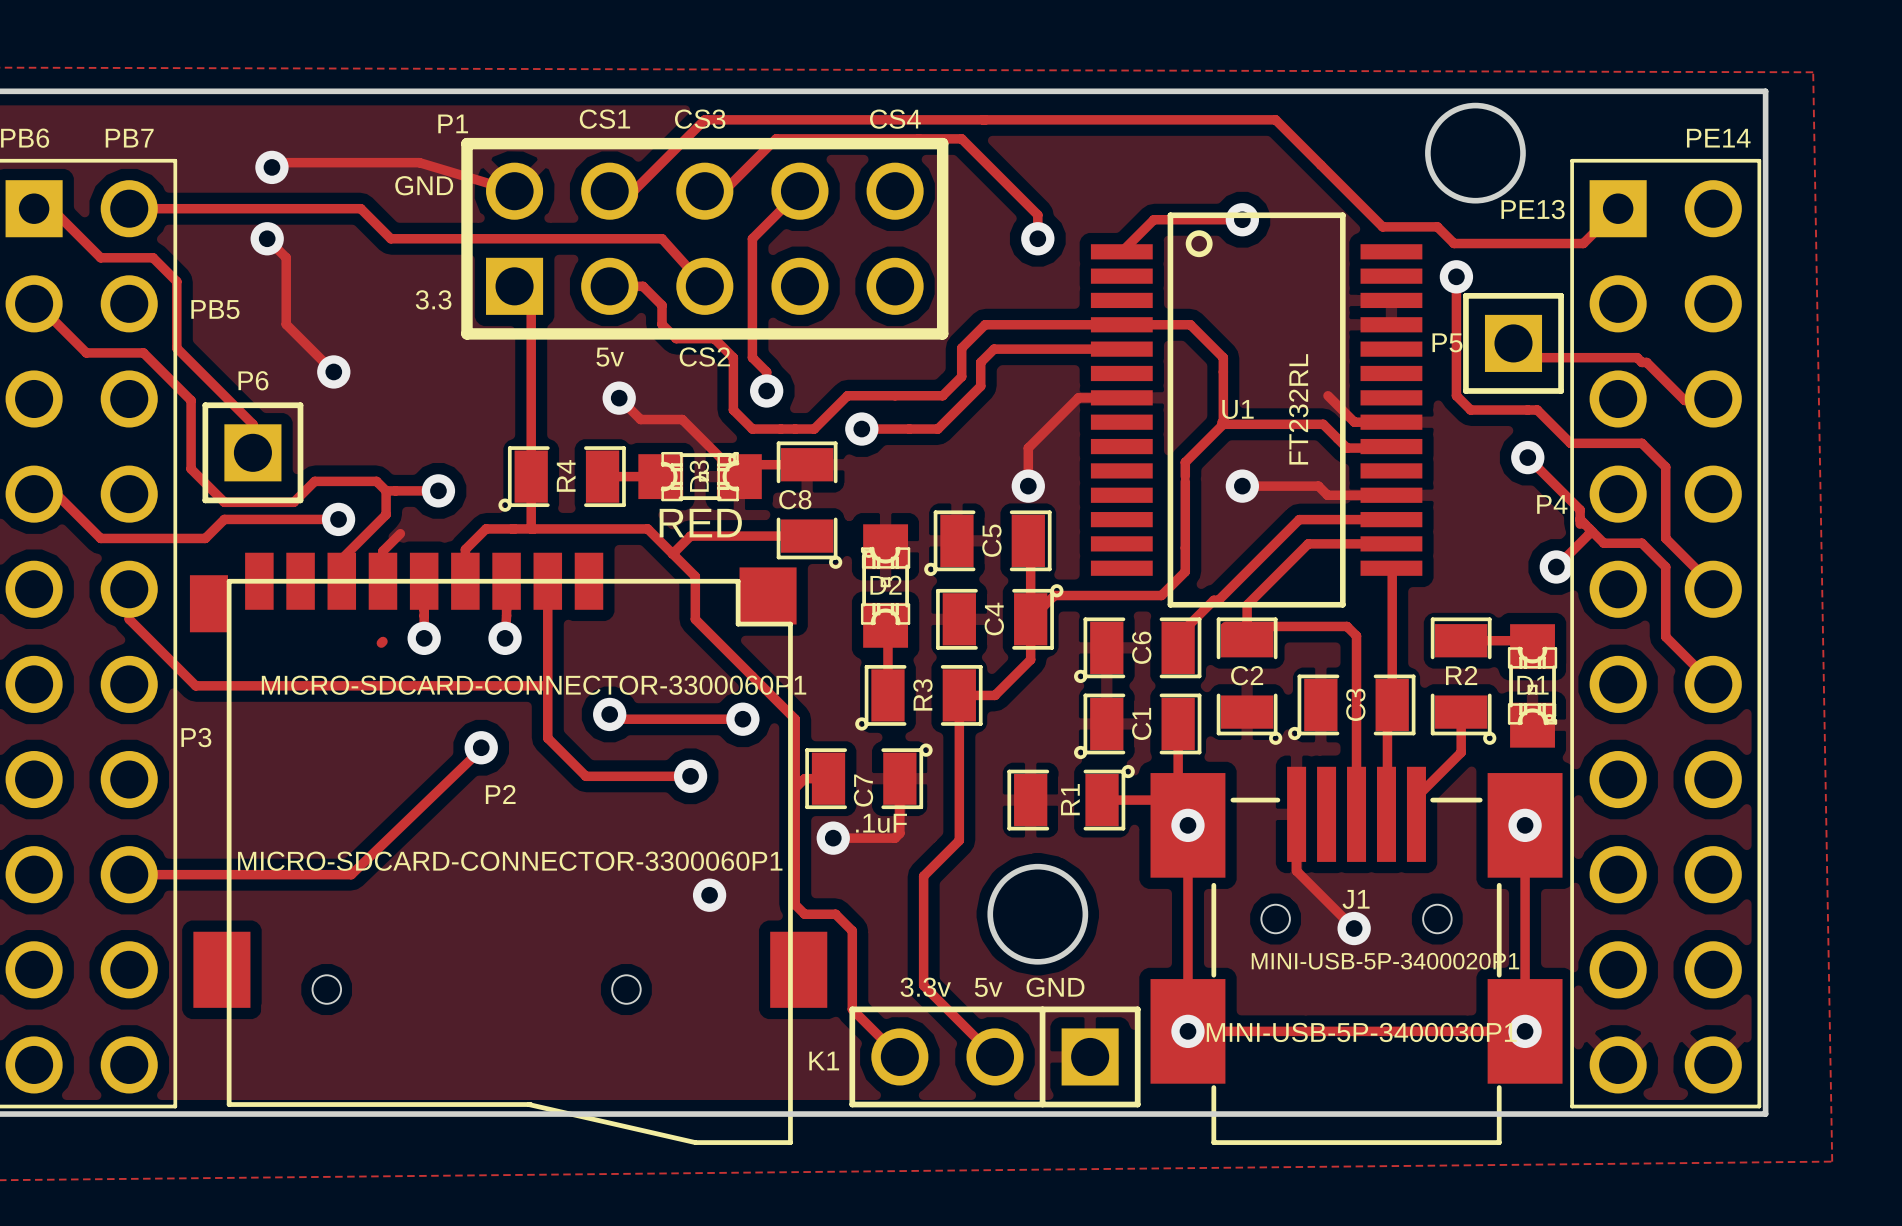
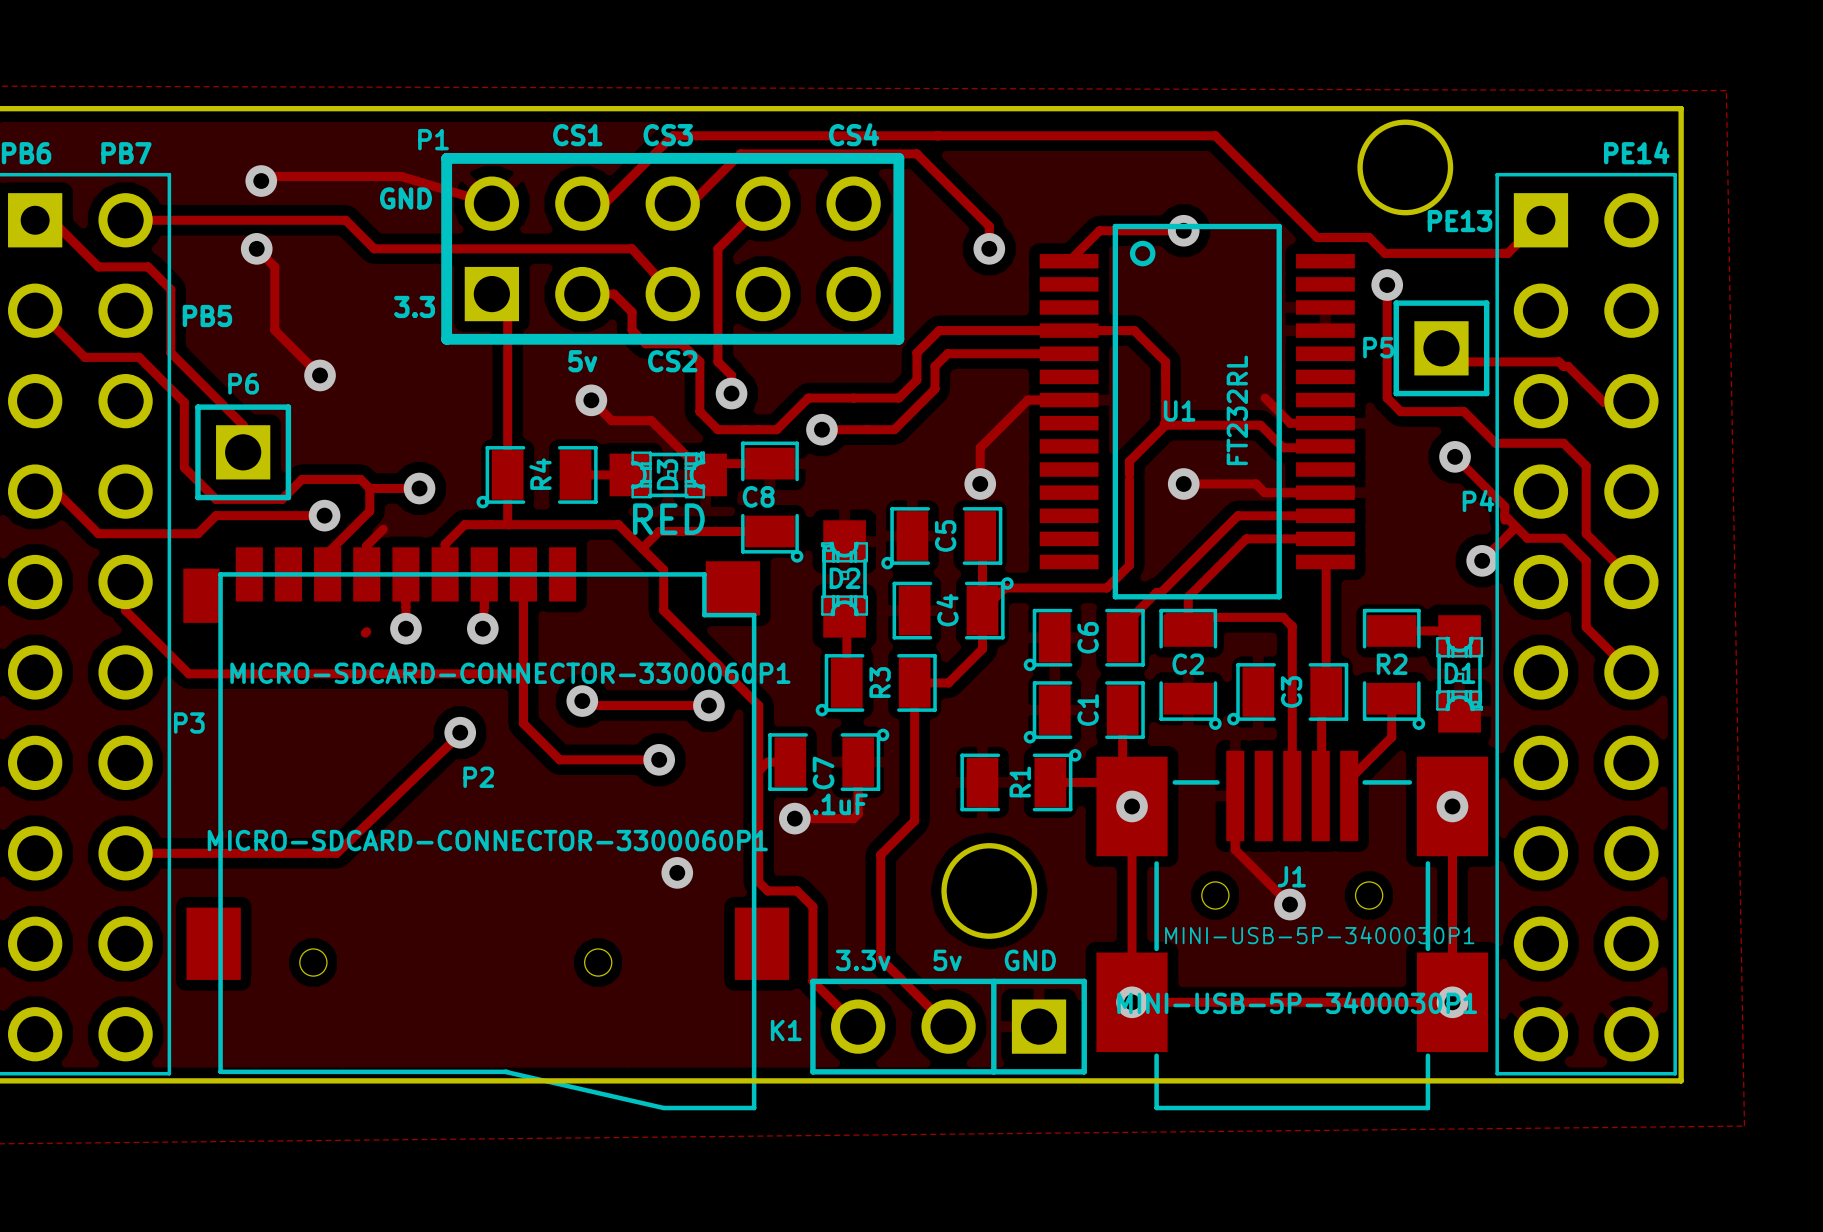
J1 value: MINI-USB-5P-3400020P1 (1385, 961) -> MINI-USB-5P-3400030P1 (1319, 935)

